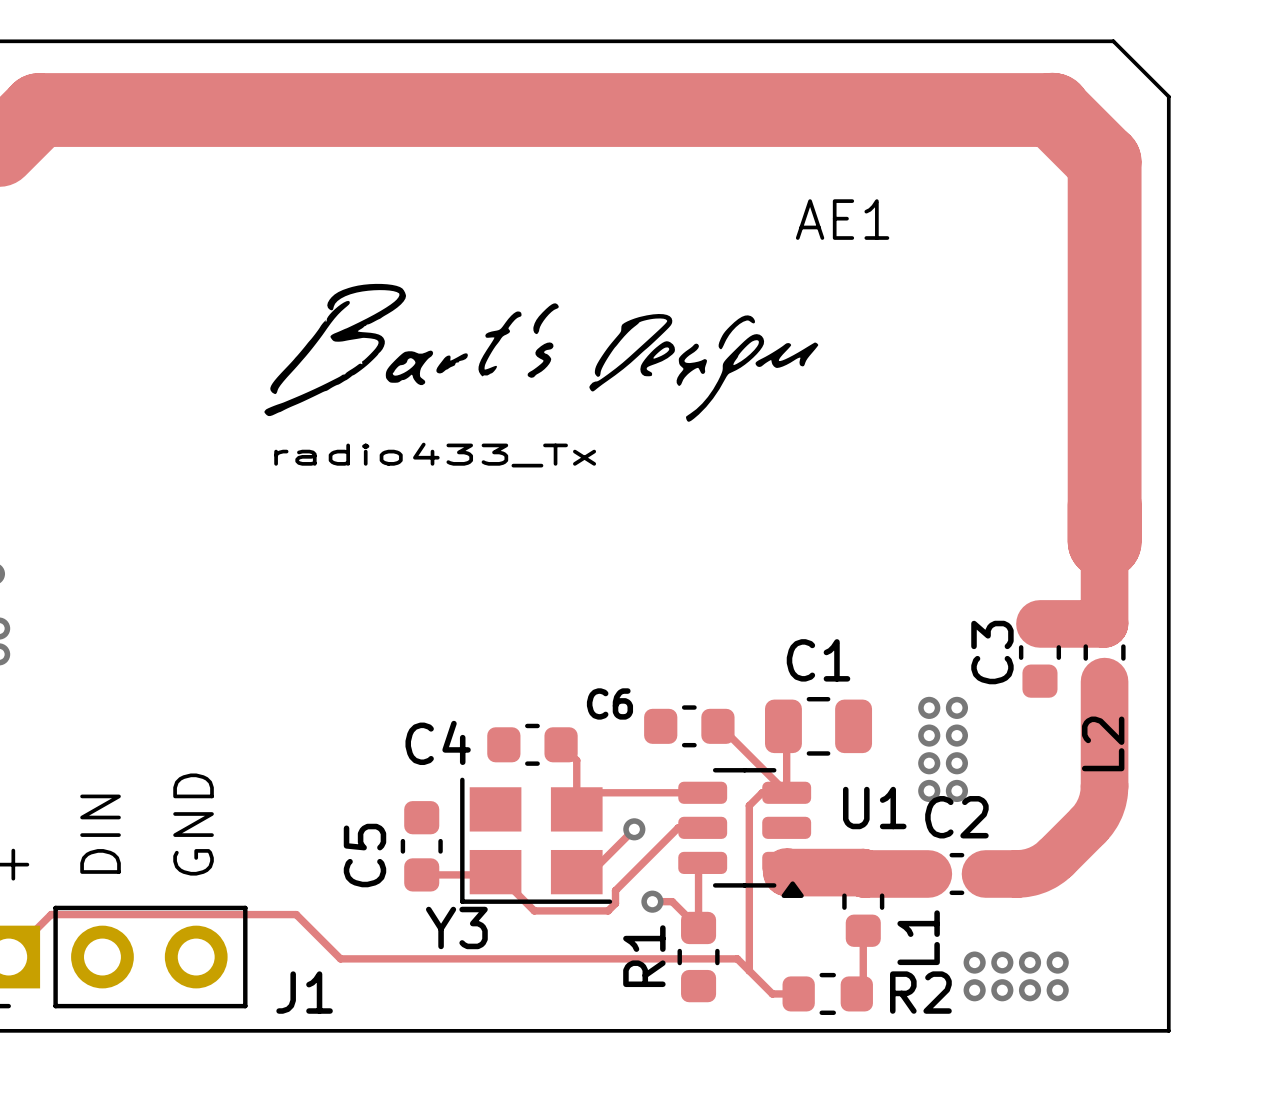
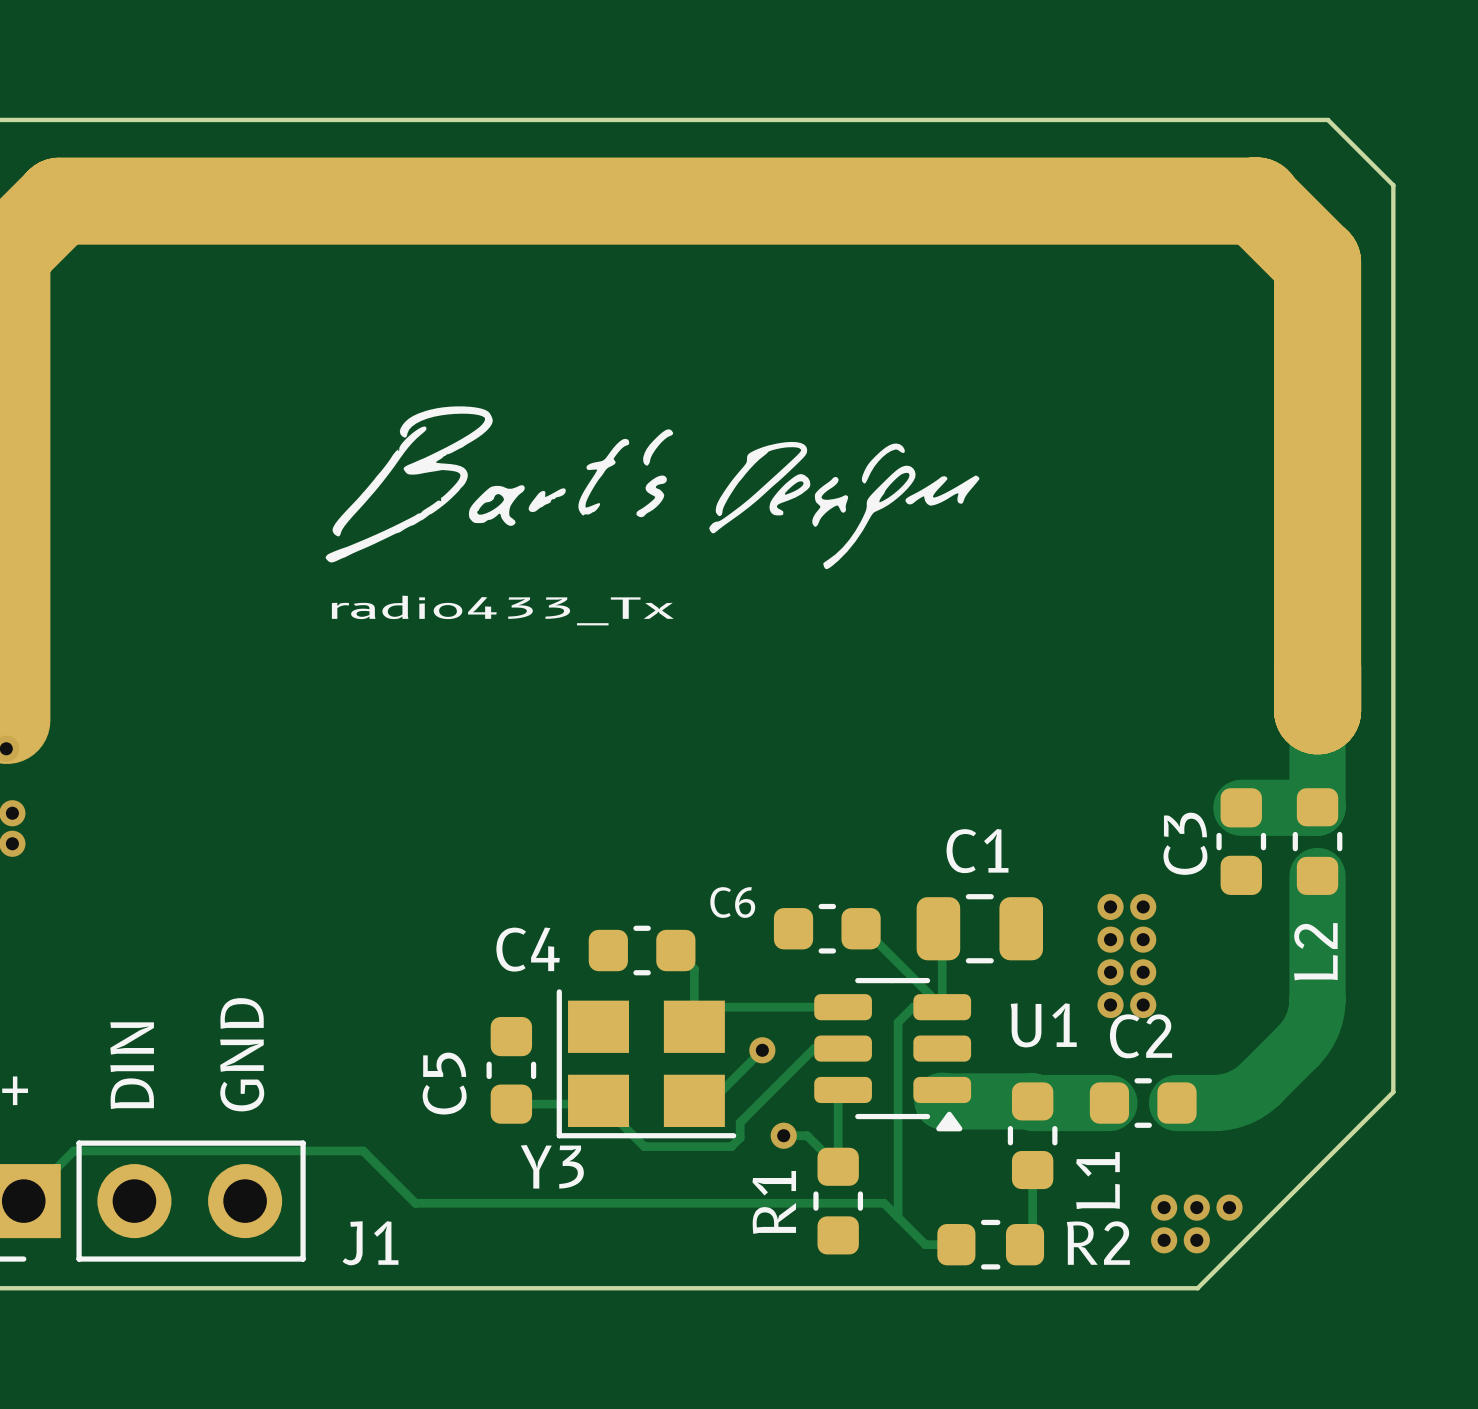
AE1 name: AE1 (842, 219) -> none
board edge: (1168, 864) (1168, 1030) (1003, 1030) -> (1393, 1092) (1197, 1288)
via: (1057, 962) -> none
via: (1030, 990) -> none
via: (1057, 990) -> none

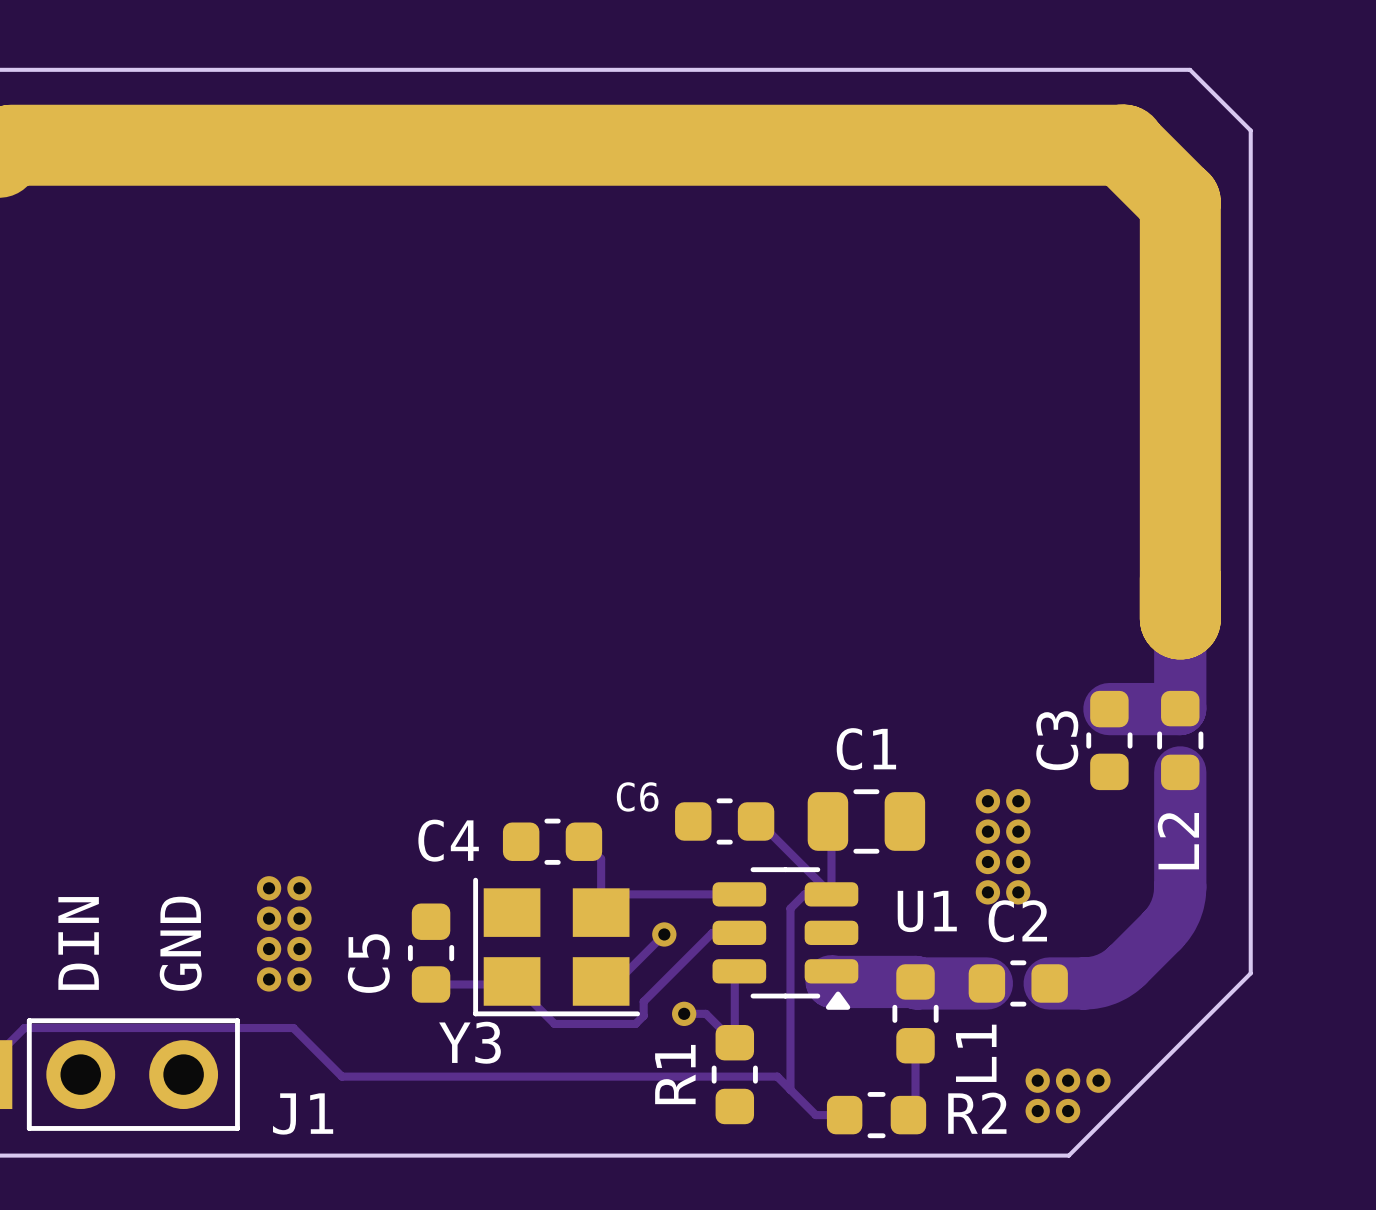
drawing: [325, 406, 980, 570] -> none
text: radio433_Tx (502, 610) -> none
via: none -> (269, 888)
via: none -> (299, 888)
via: none -> (269, 918)
via: none -> (299, 918)
via: none -> (269, 949)
via: none -> (299, 949)
via: none -> (269, 979)
via: none -> (299, 979)

